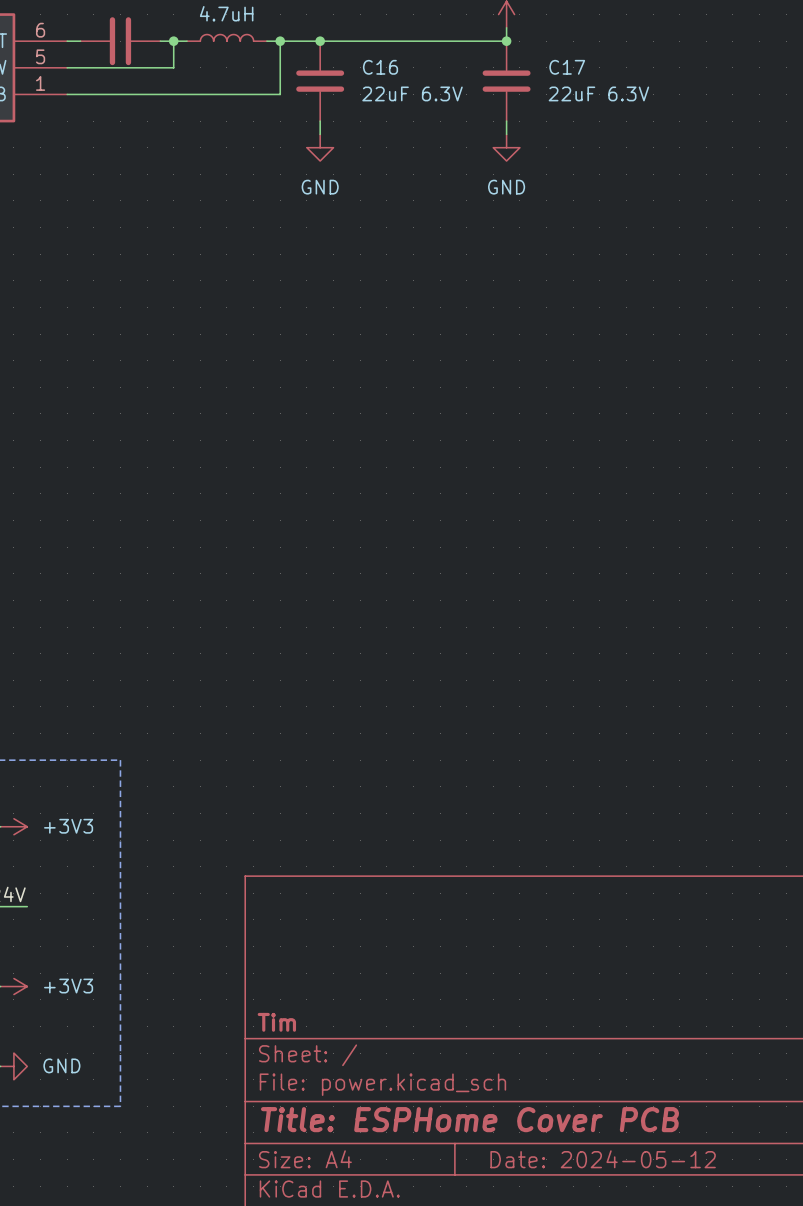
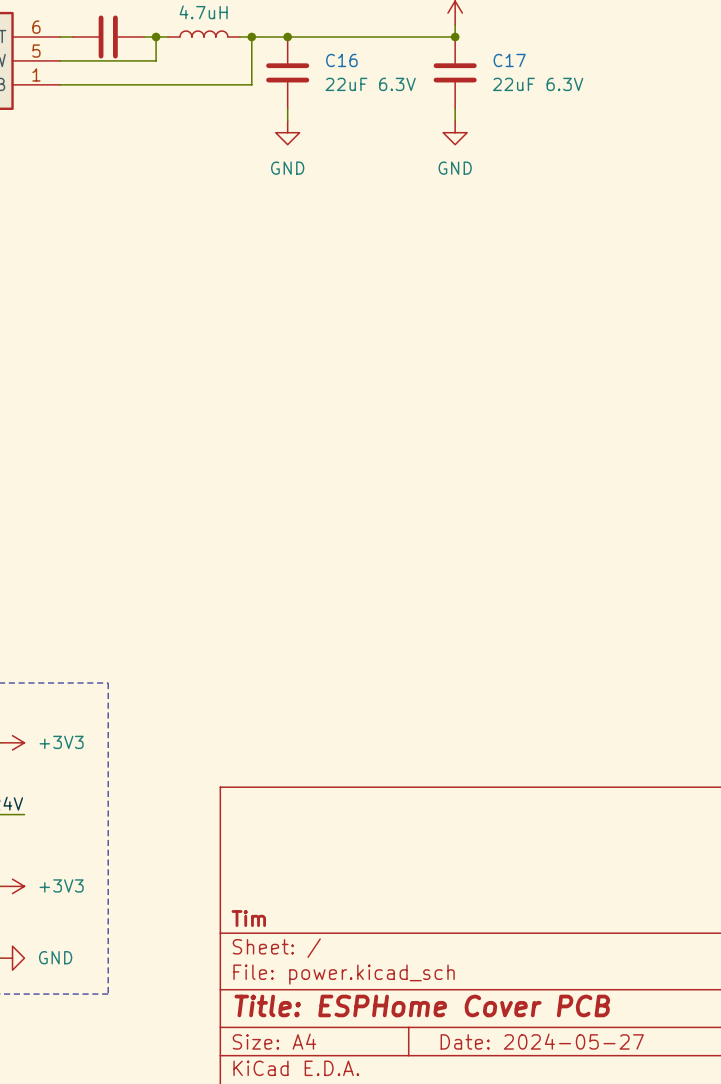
title block: Date: 2024-05-12 (603, 1159) -> Date: 2024-05-27 (542, 1041)

